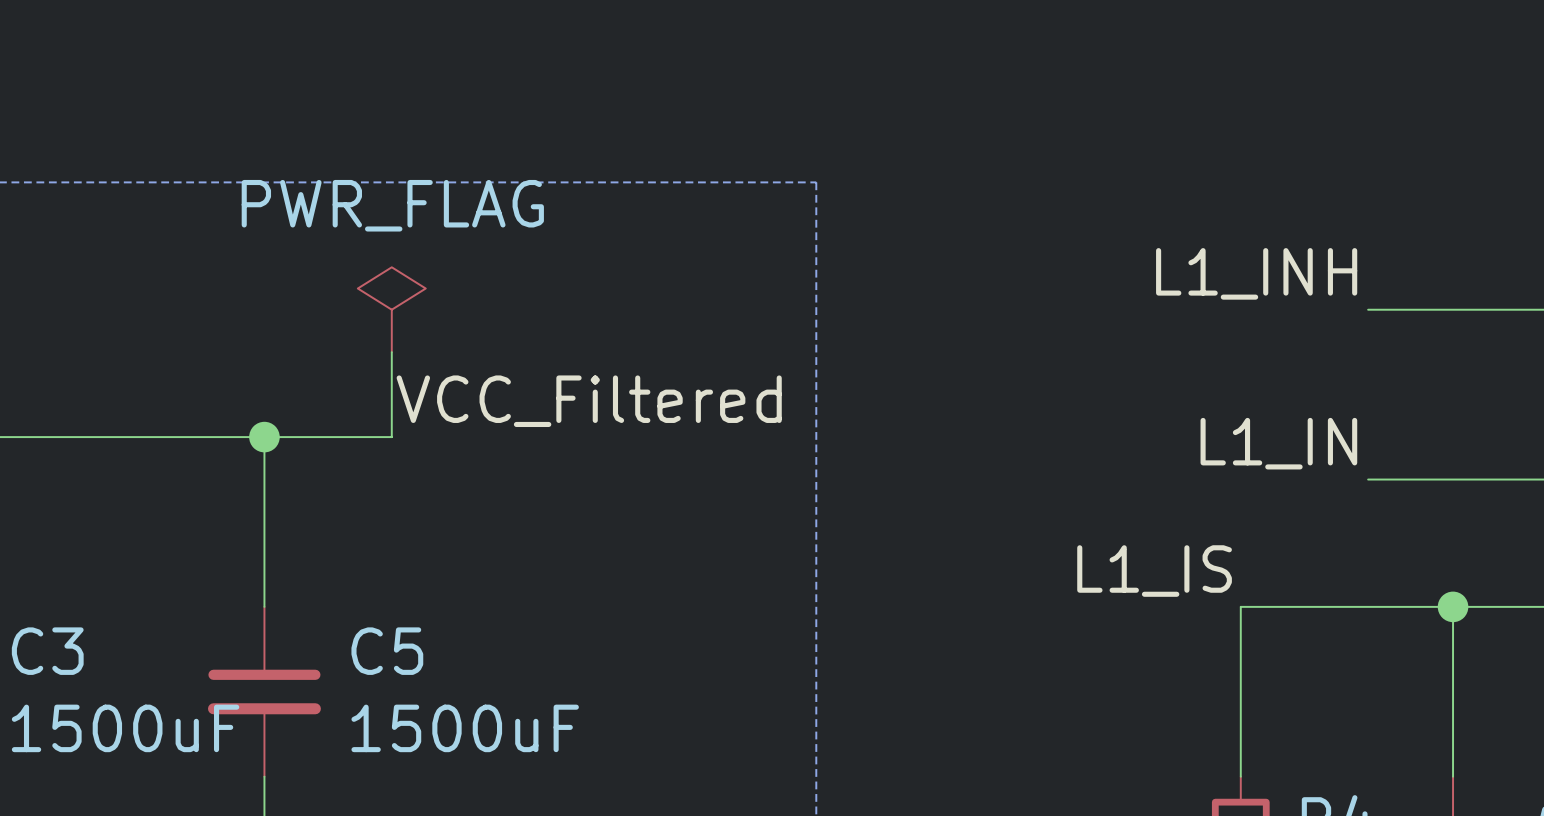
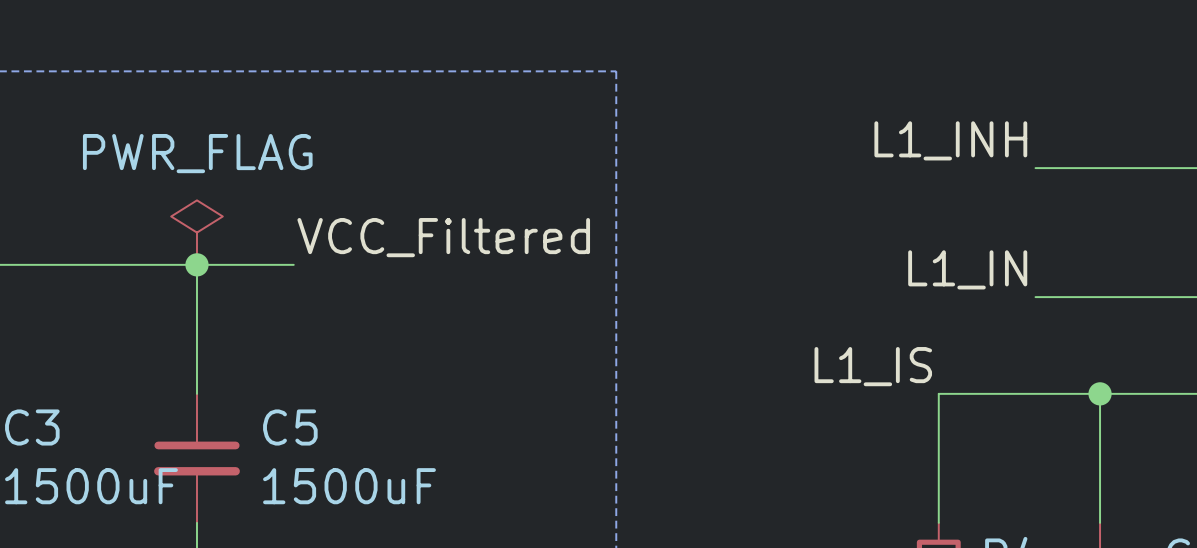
power symbol position: PWR_FLAG (391, 309) -> PWR_FLAG (196, 232)
wire: (391, 352) (391, 437) -> none

